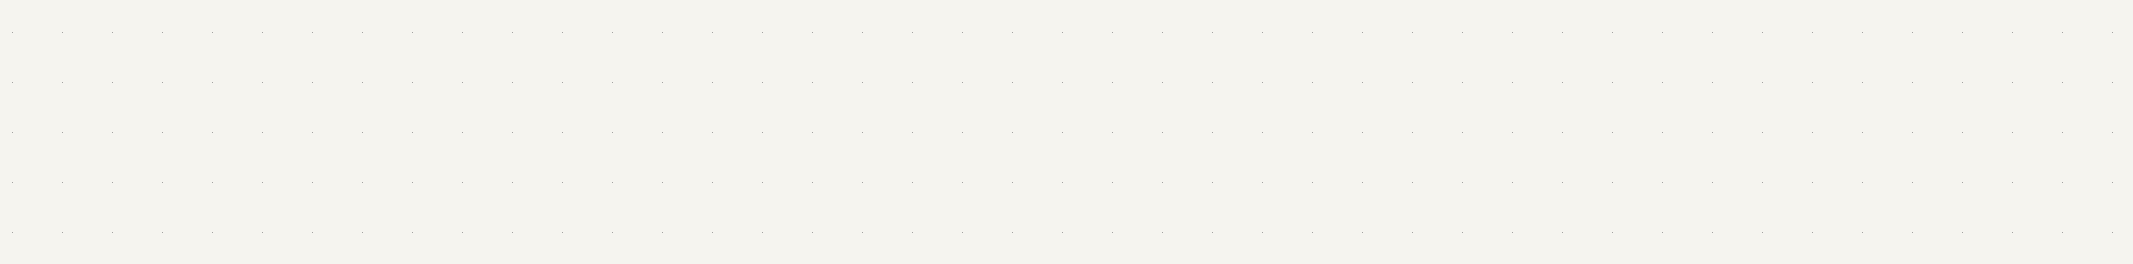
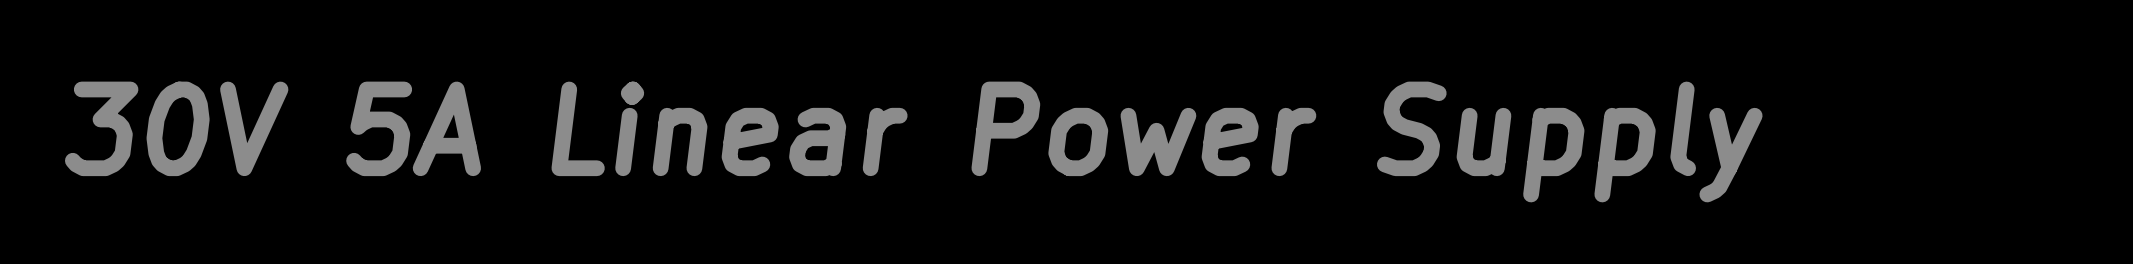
text: none -> 30V 5A Linear Power Supply (913, 141)

